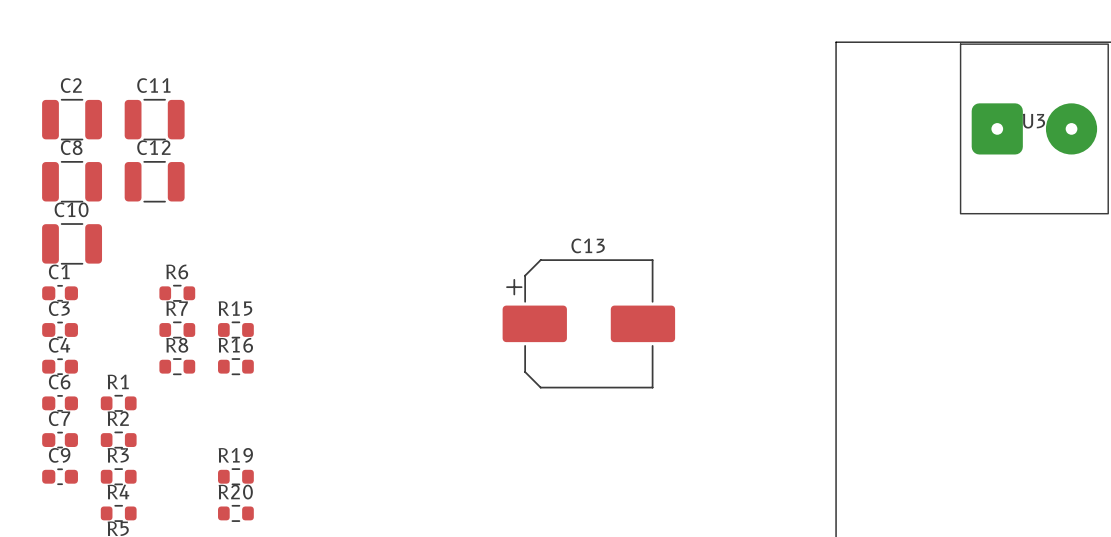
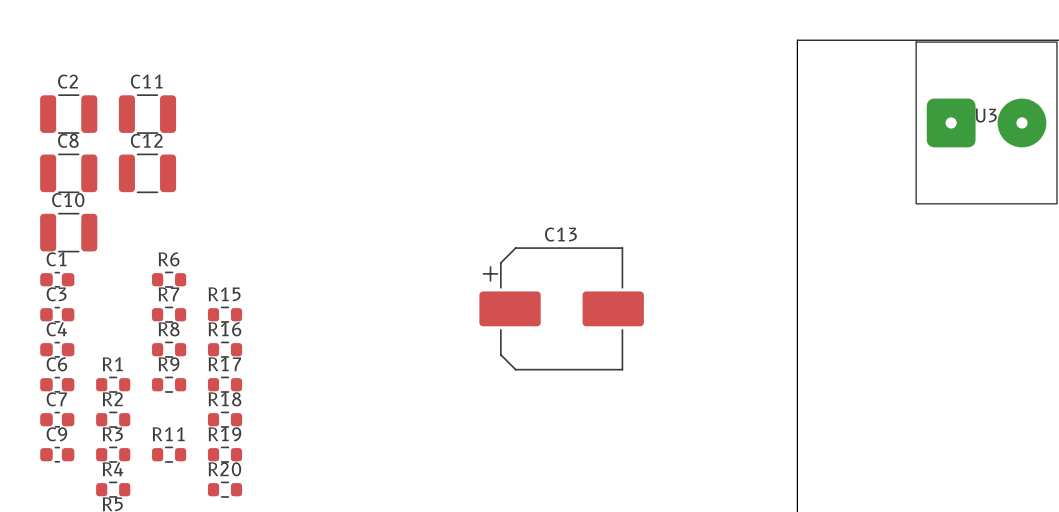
R9: none -> (169, 384)
R17: none -> (225, 384)
R18: none -> (225, 419)
R11: none -> (169, 454)

